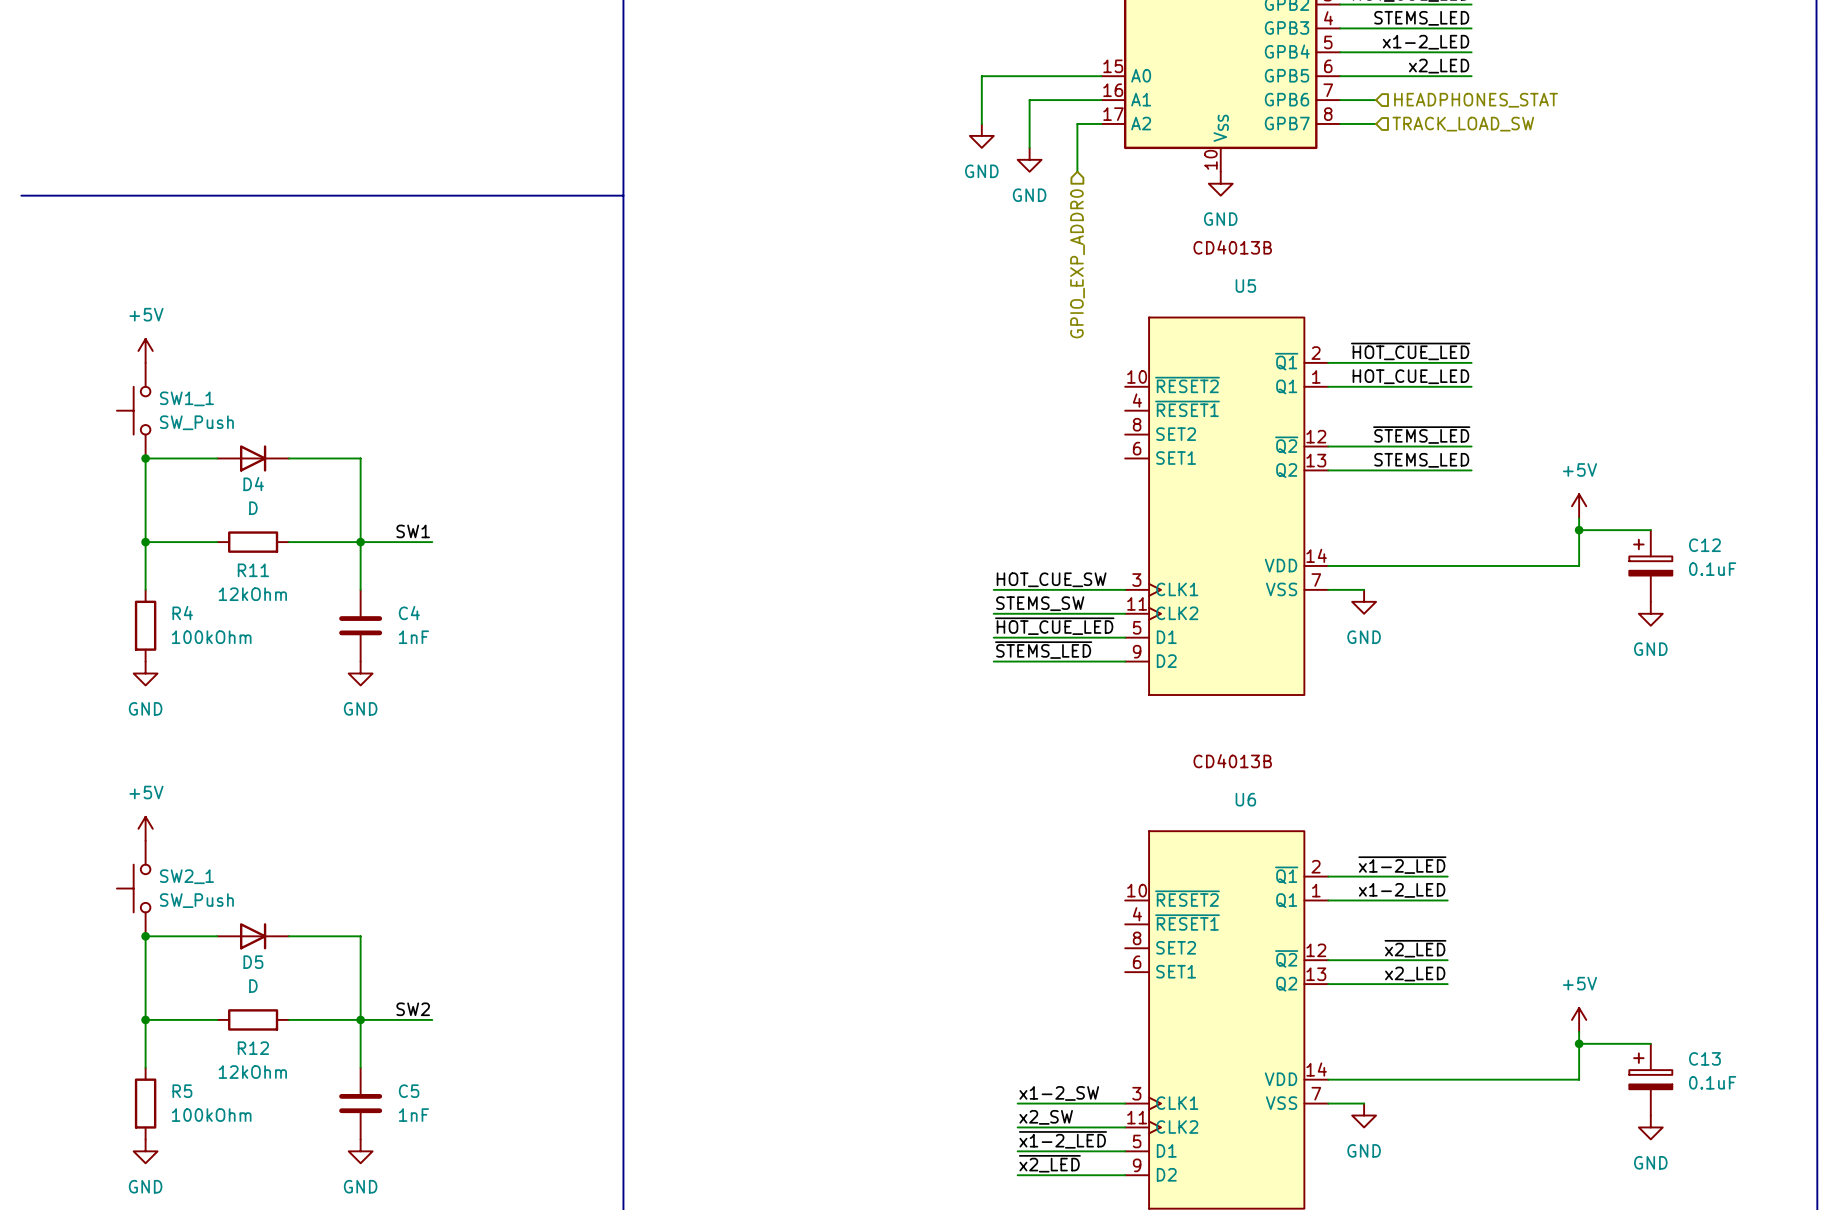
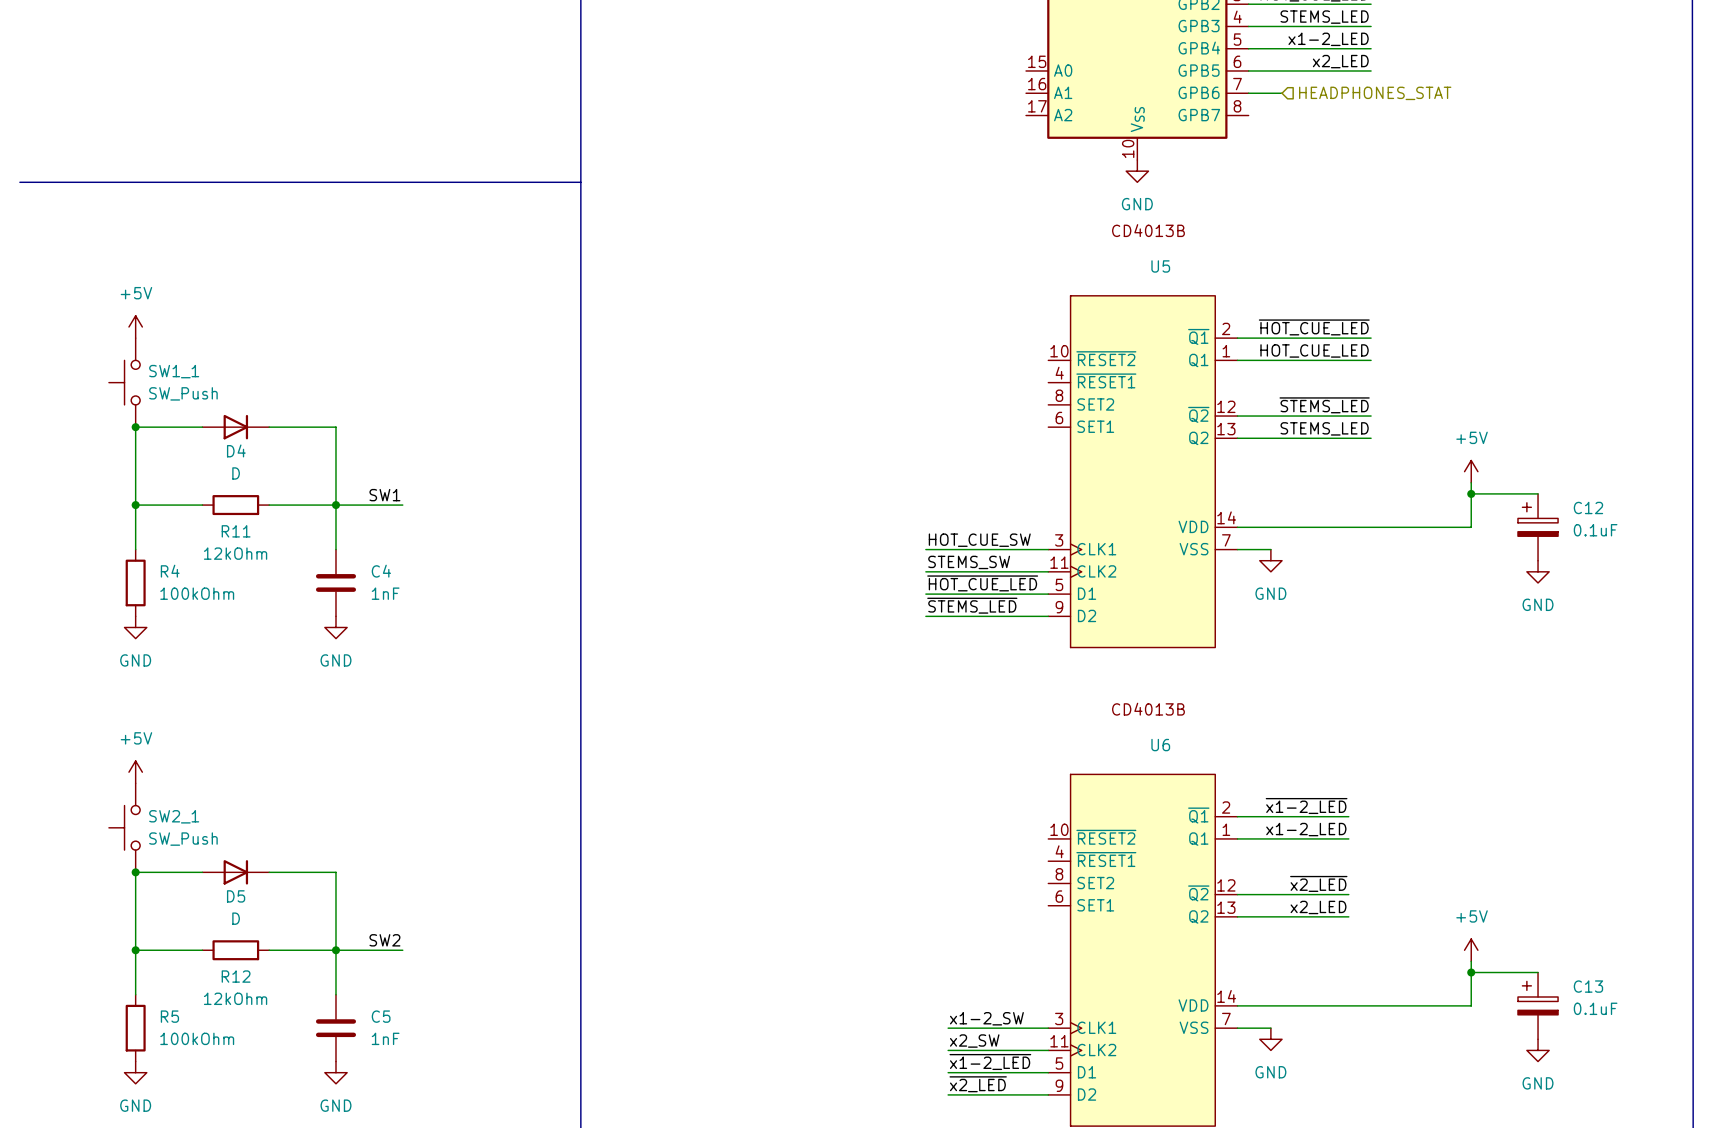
wire: (1101, 76) (981, 76) (981, 123) -> none
wire: (1101, 100) (1029, 100) (1029, 147) -> none
wire: (1101, 123) (1077, 123) (1077, 171) -> none
wire: (1340, 123) (1376, 123) -> none
hierarchical label: TRACK_LOAD_SW (1463, 124) -> none
power symbol: GND (981, 135) -> none
power symbol: GND (1029, 159) -> none
hierarchical label: GPIO_EXP_ADDR0 (1077, 263) -> none

